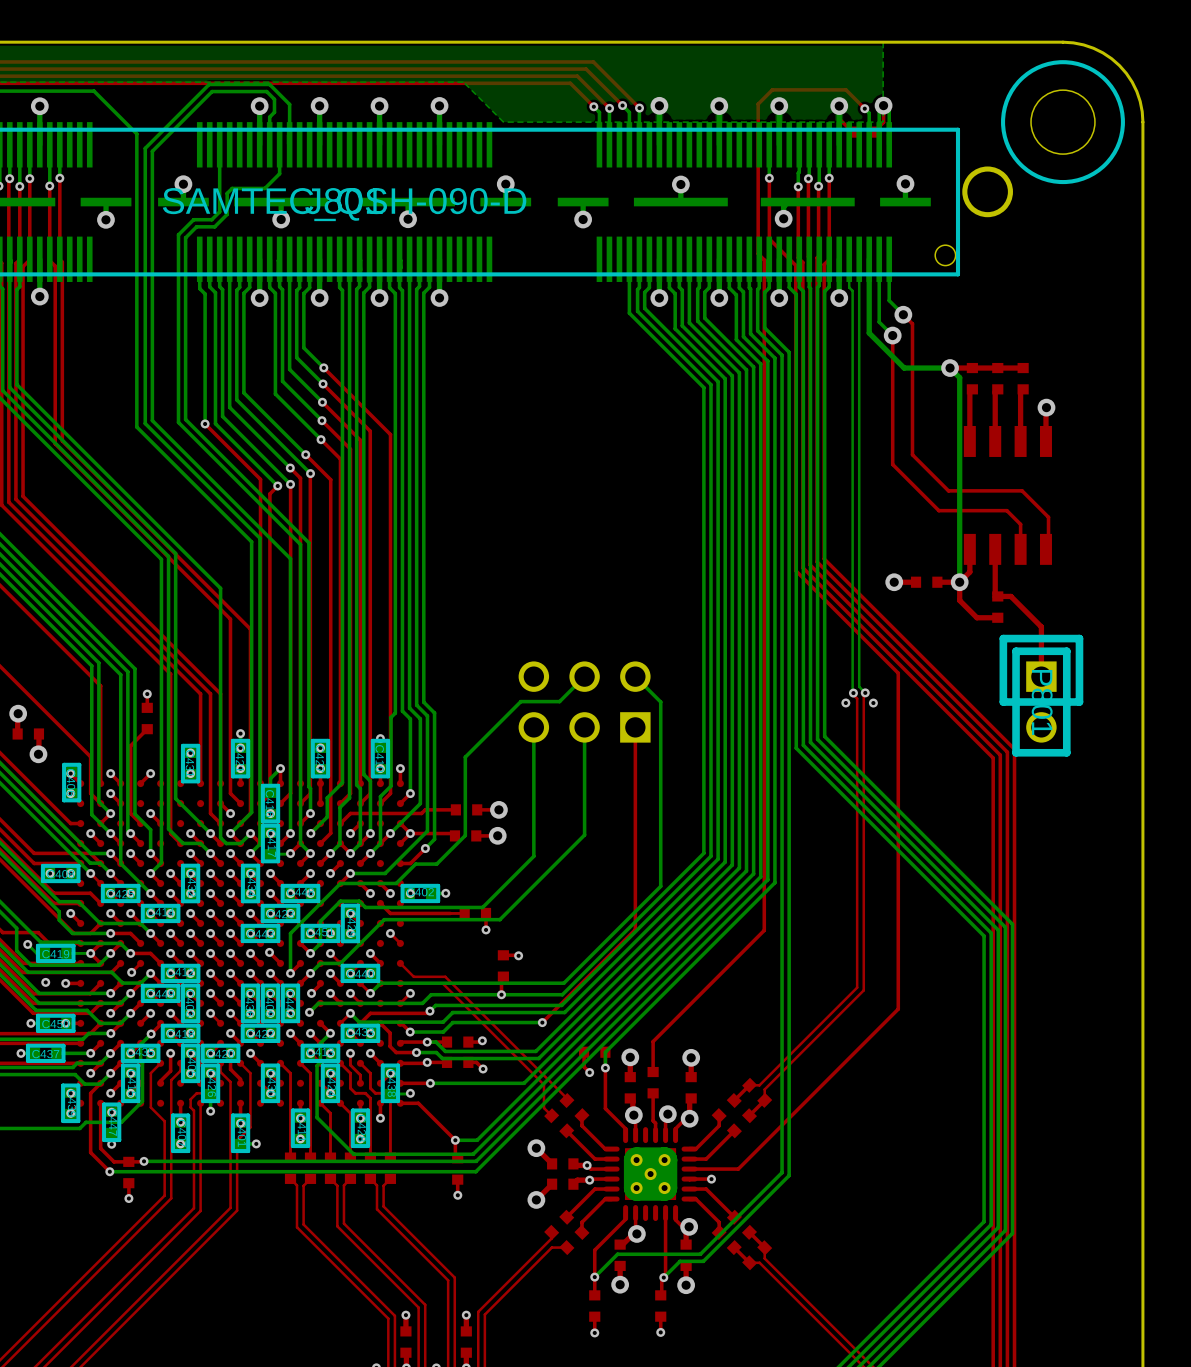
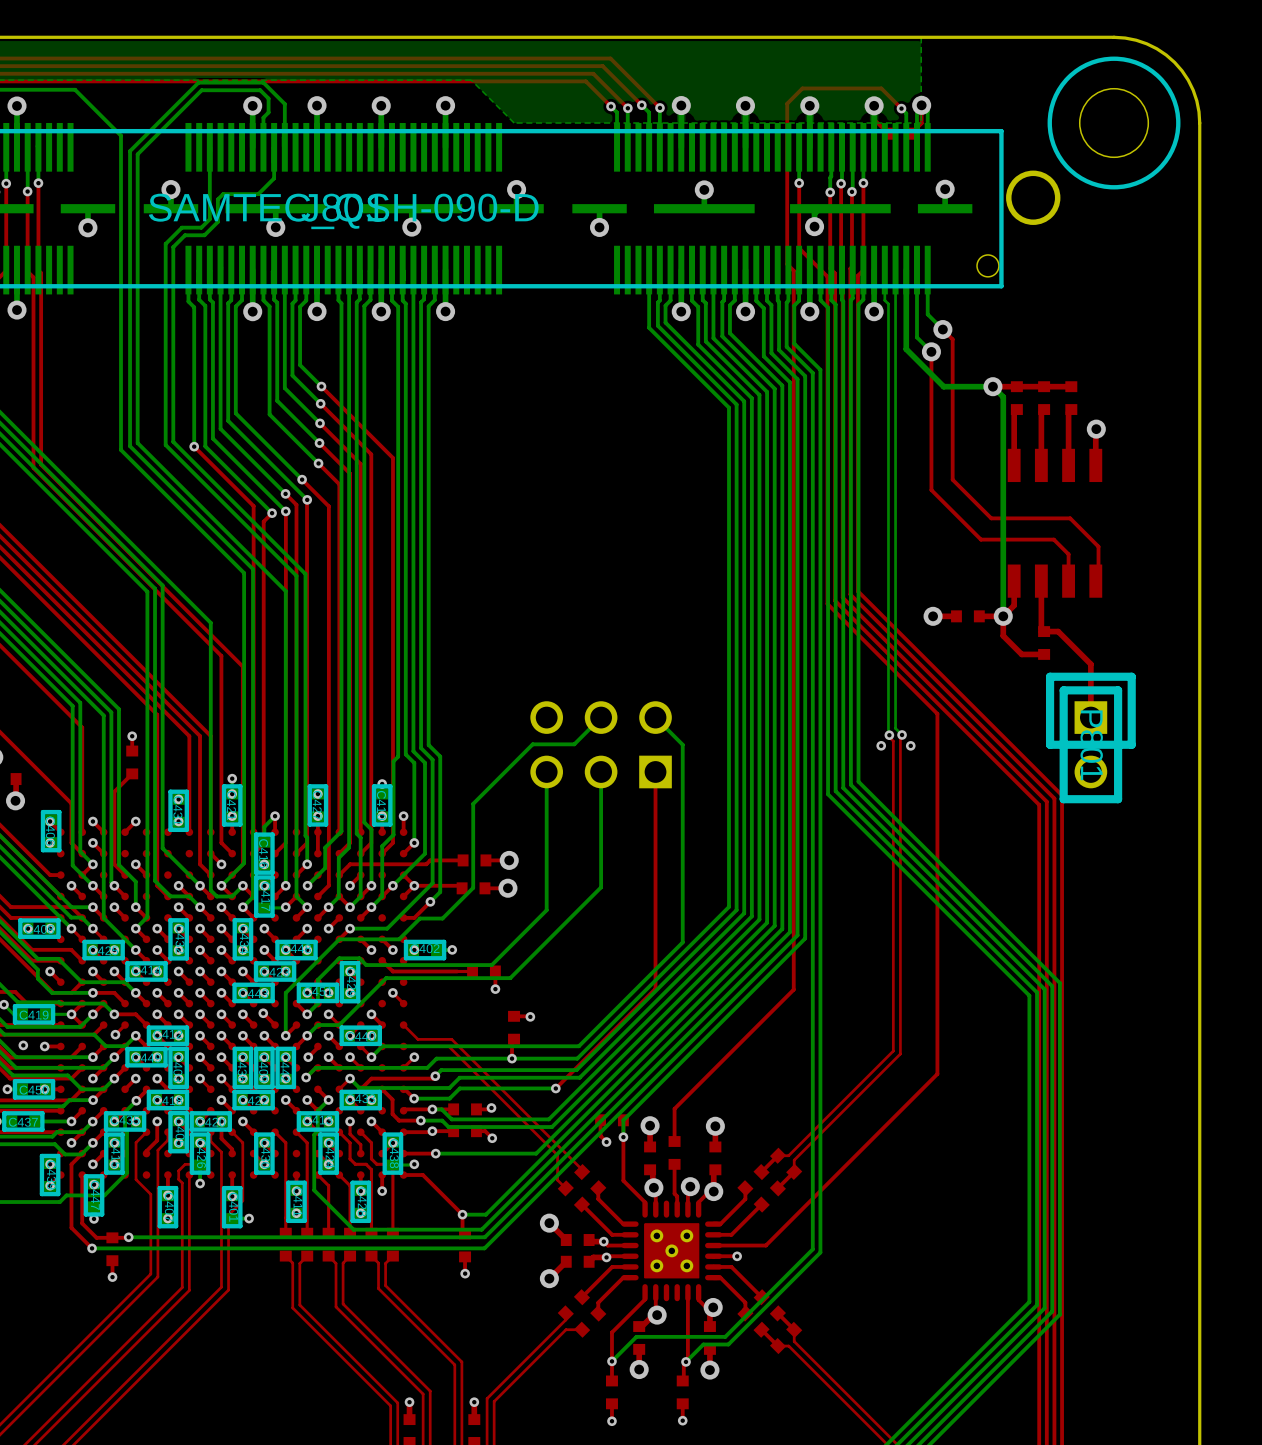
bottom track: (664, 1160) (636, 1160) (636, 1188) (664, 1188) (664, 1160) -> none

